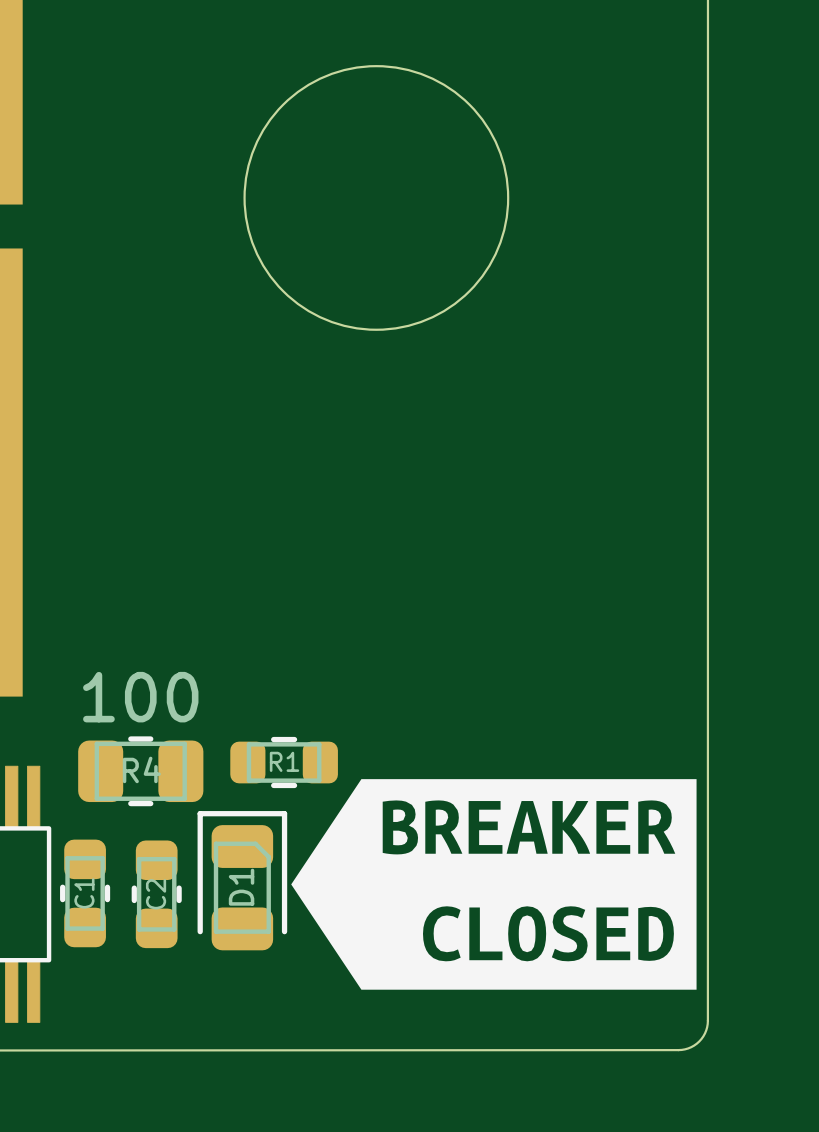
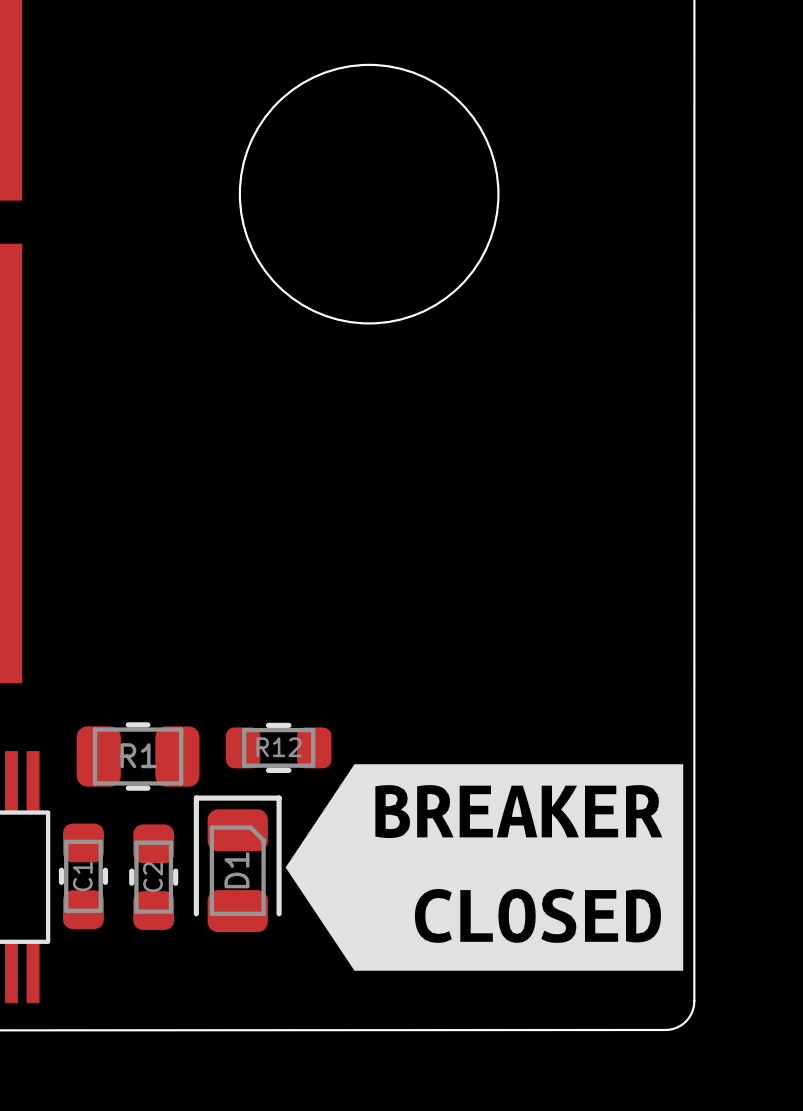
R4 value: 100 (140, 697) -> none
R1 name: R1 (284, 761) -> R12 (279, 747)
R4 name: R4 (141, 769) -> R1 (138, 755)

